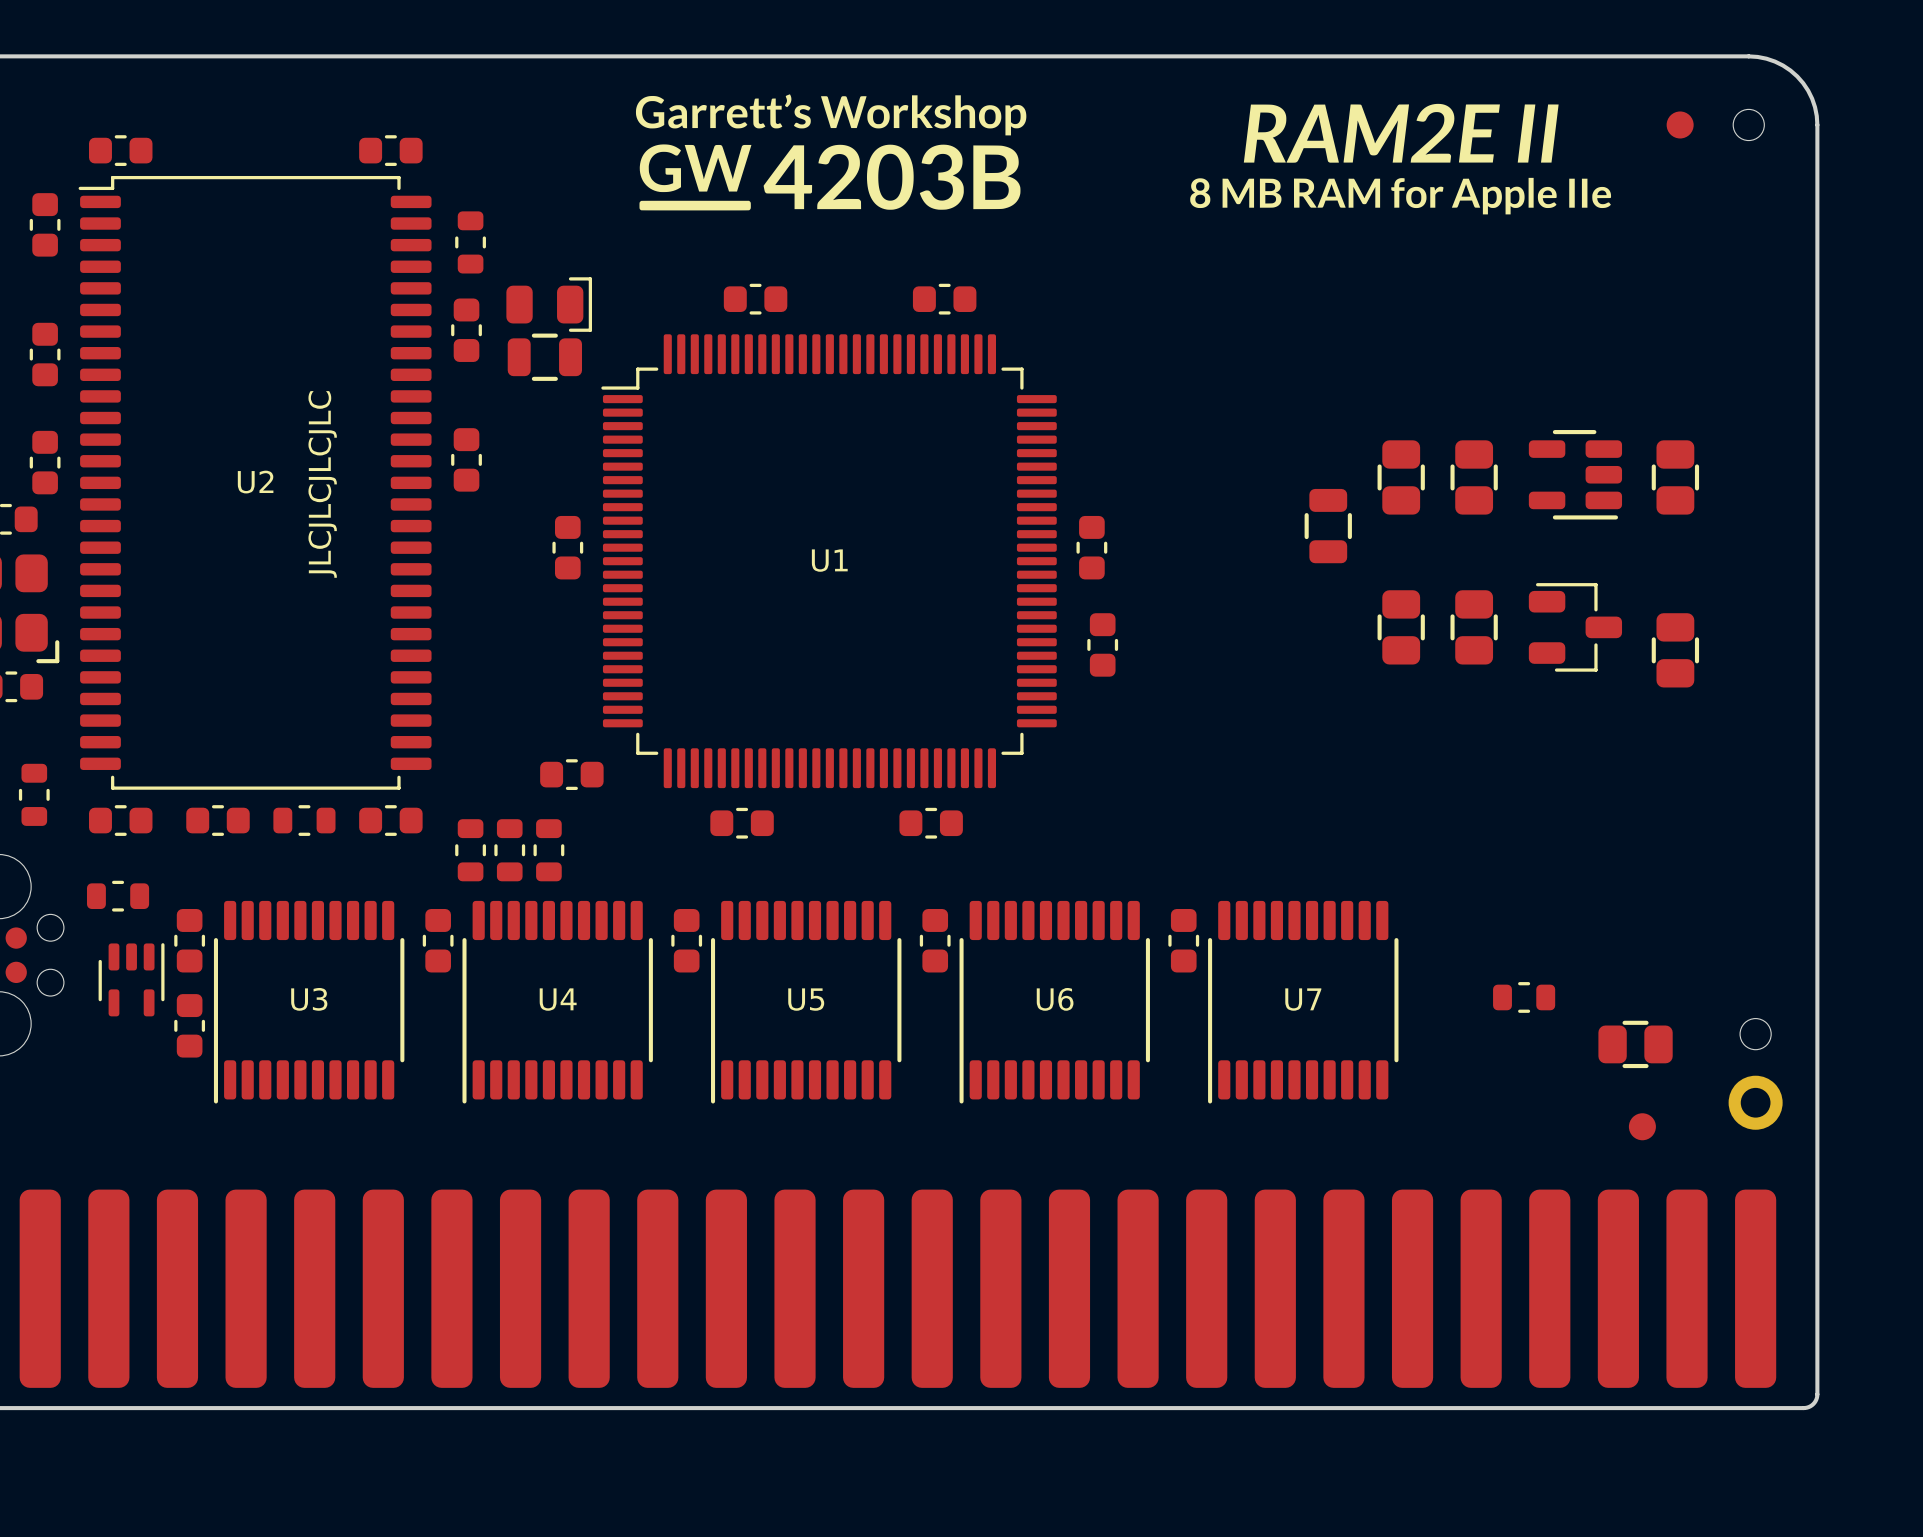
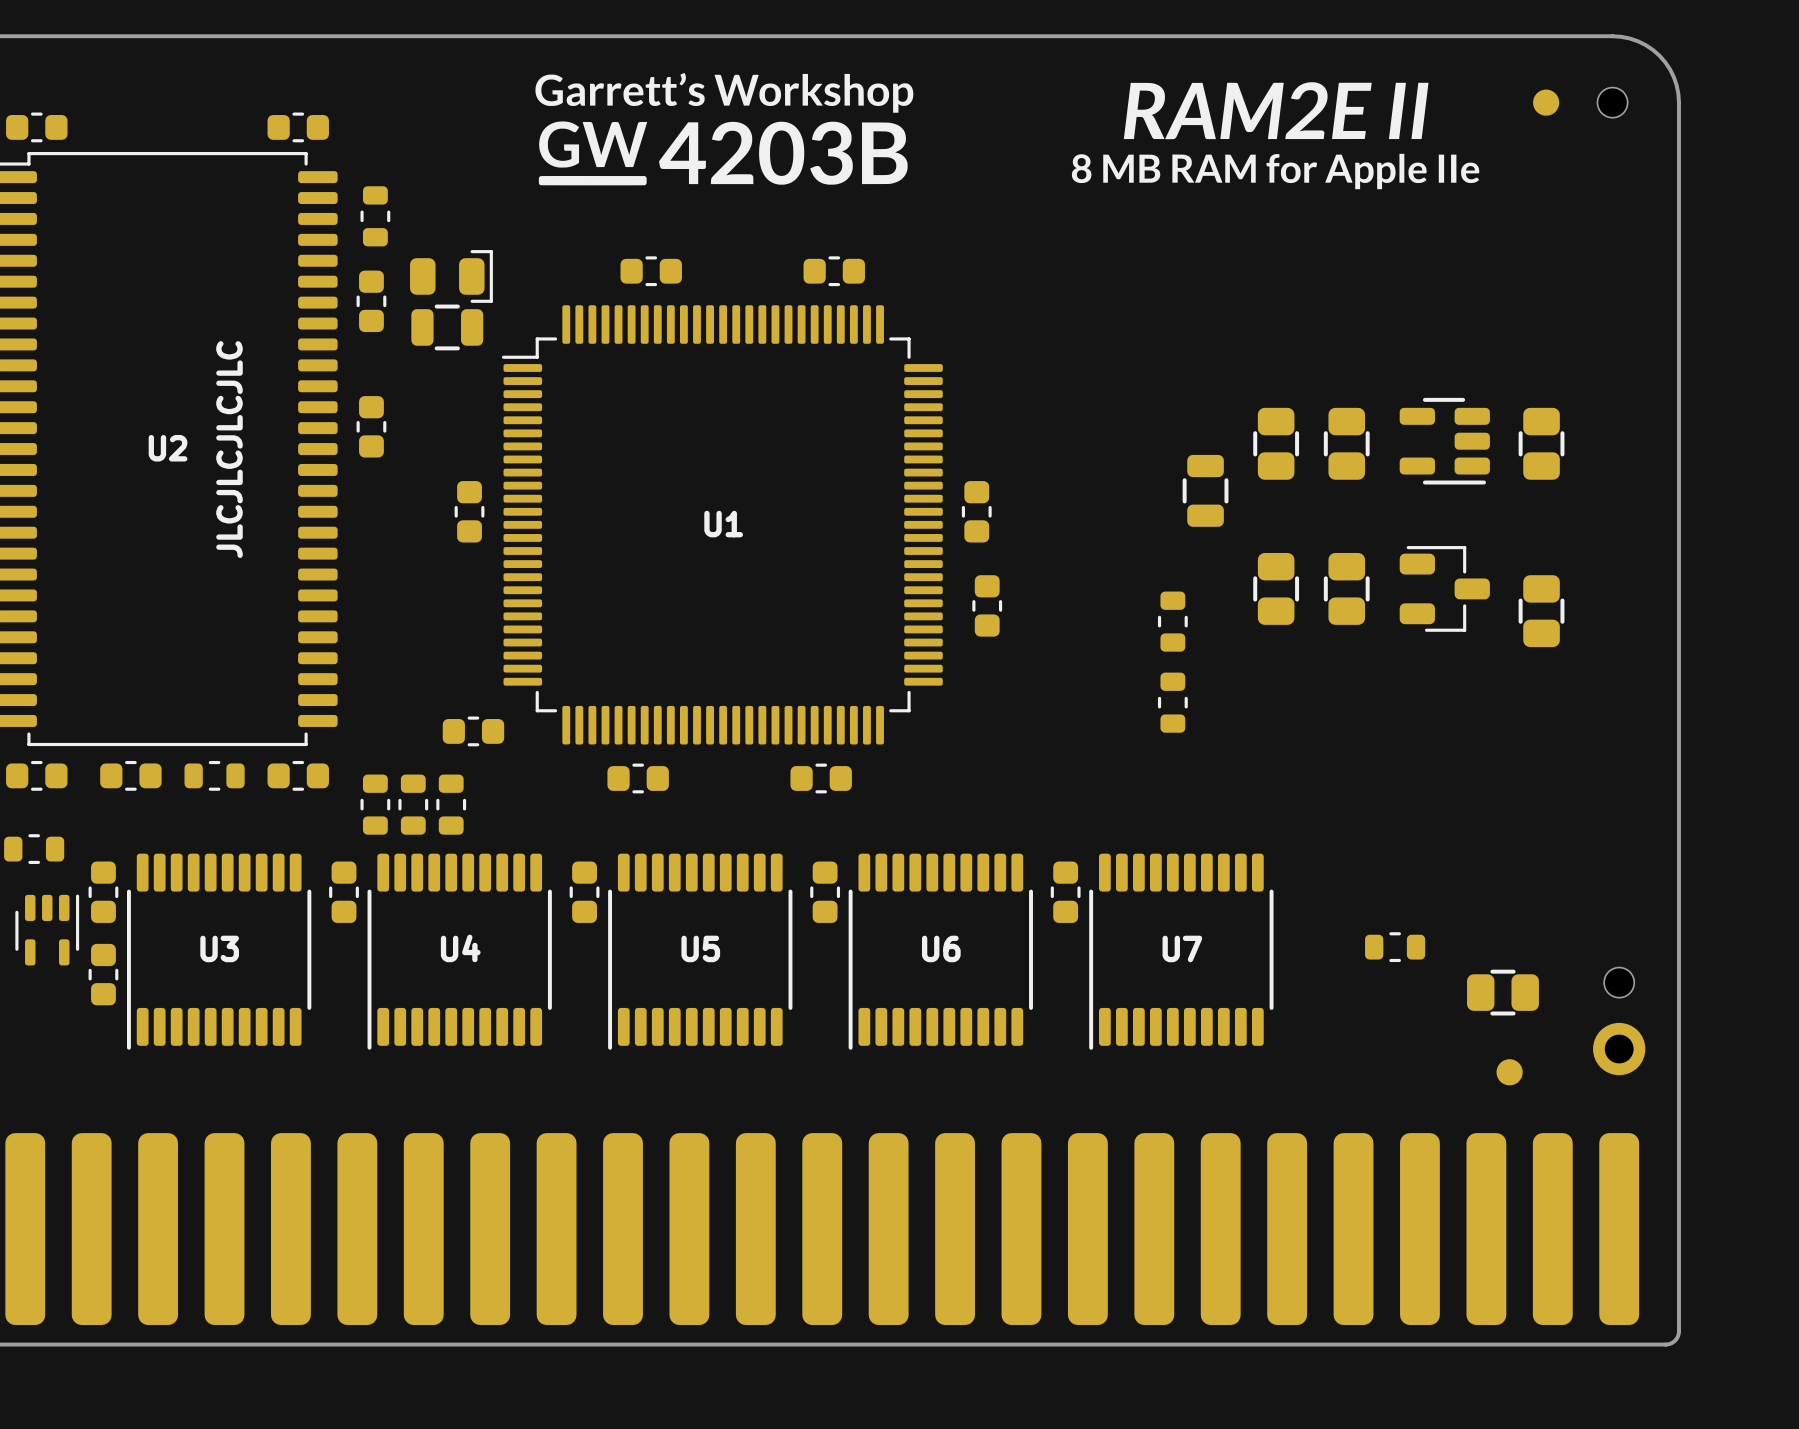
part: none -> (1172, 621)
part: none -> (1172, 702)

